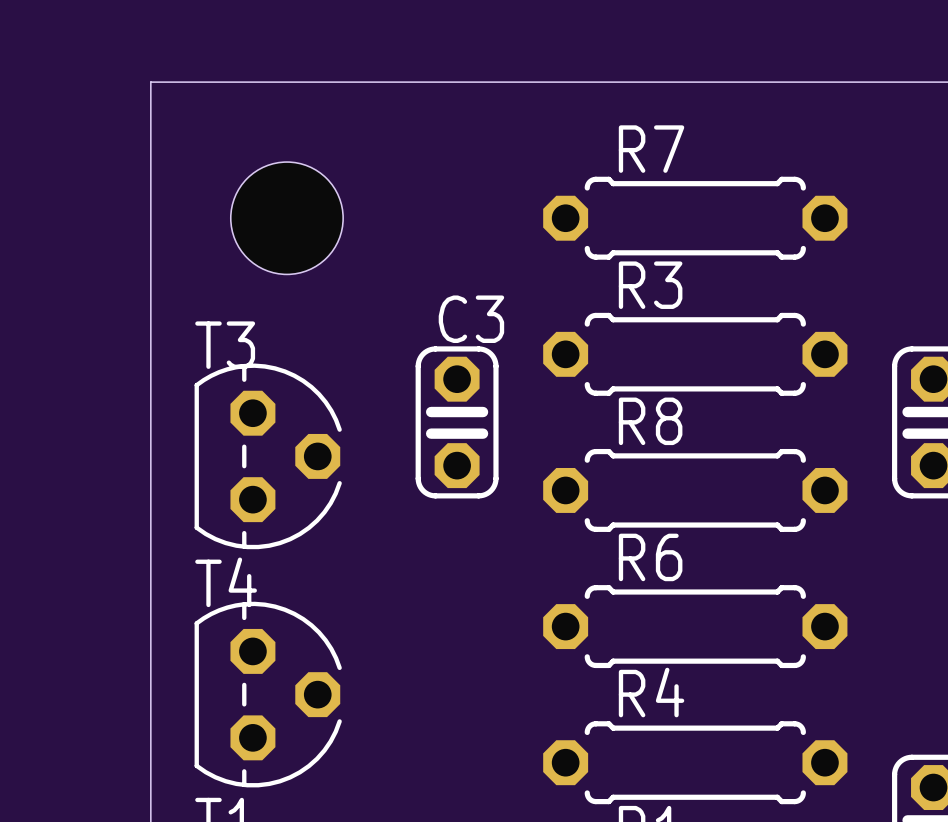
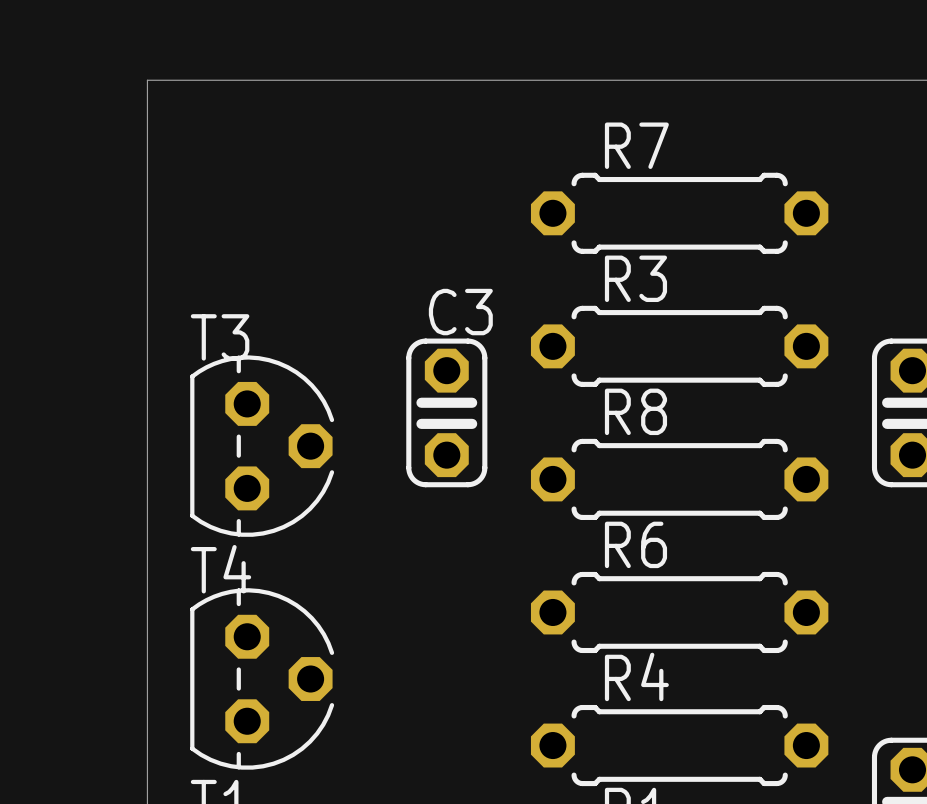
part: (286, 218) -> none

